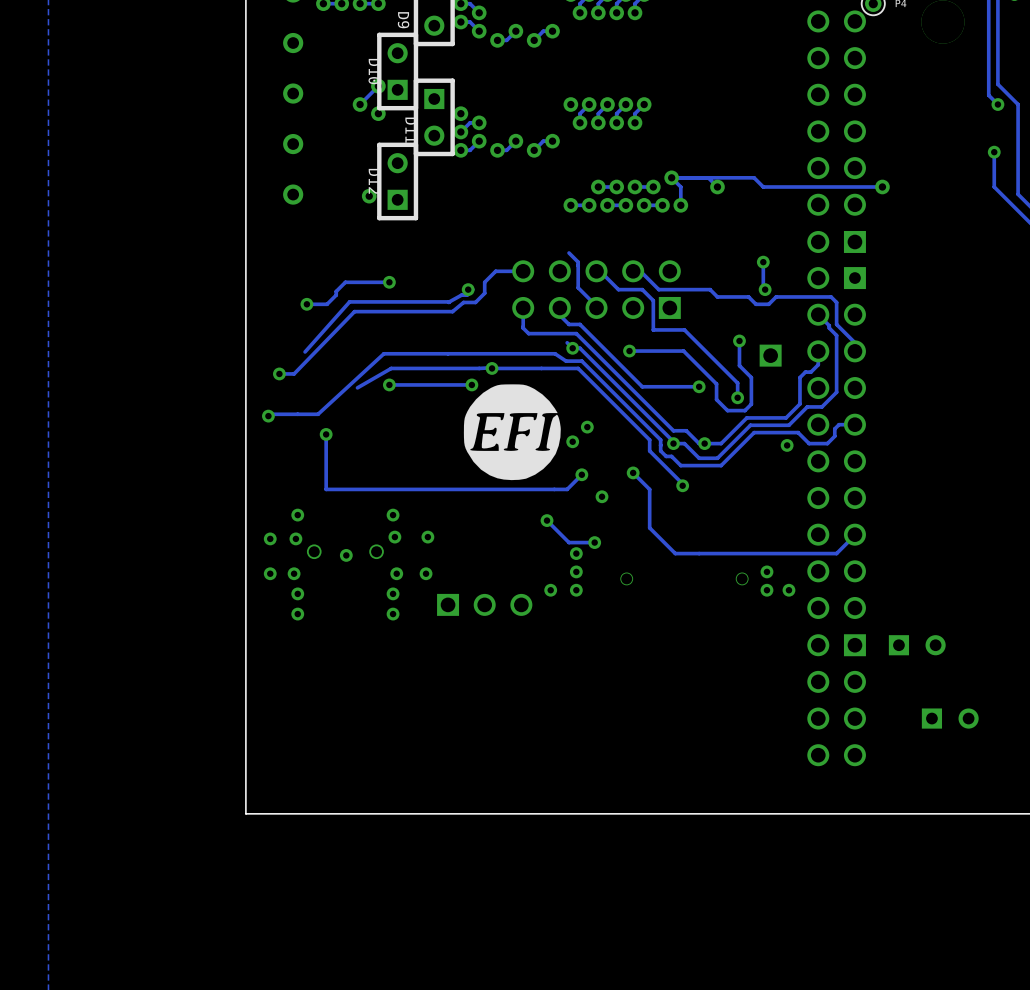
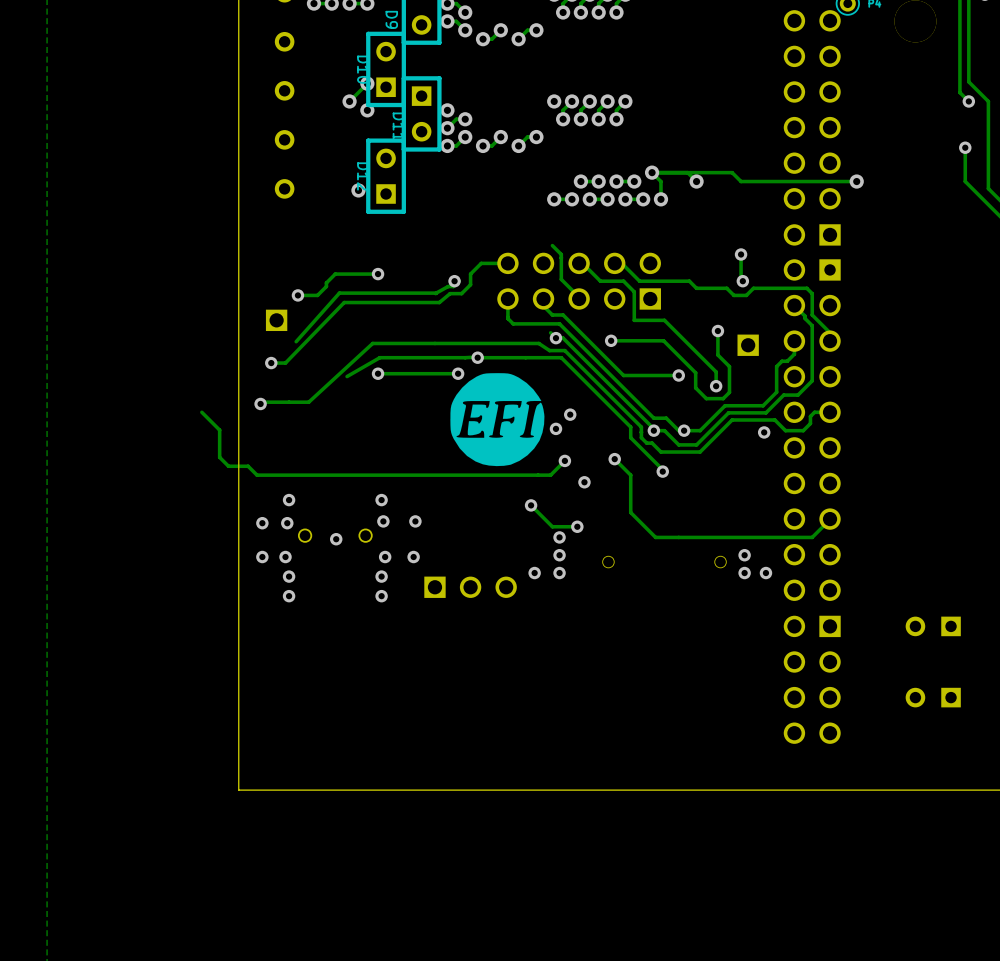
part: none -> (276, 320)
track: (326, 434) (326, 489) -> (201, 412) (219, 430) (219, 457) (228, 466) (248, 466) (257, 475) (316, 475)
via: (326, 434) -> none
part rotation: 0° (917, 645) -> 180° (933, 626)
part position: (917, 645) -> (933, 626)
part rotation: 0° (950, 718) -> 180° (933, 697)

